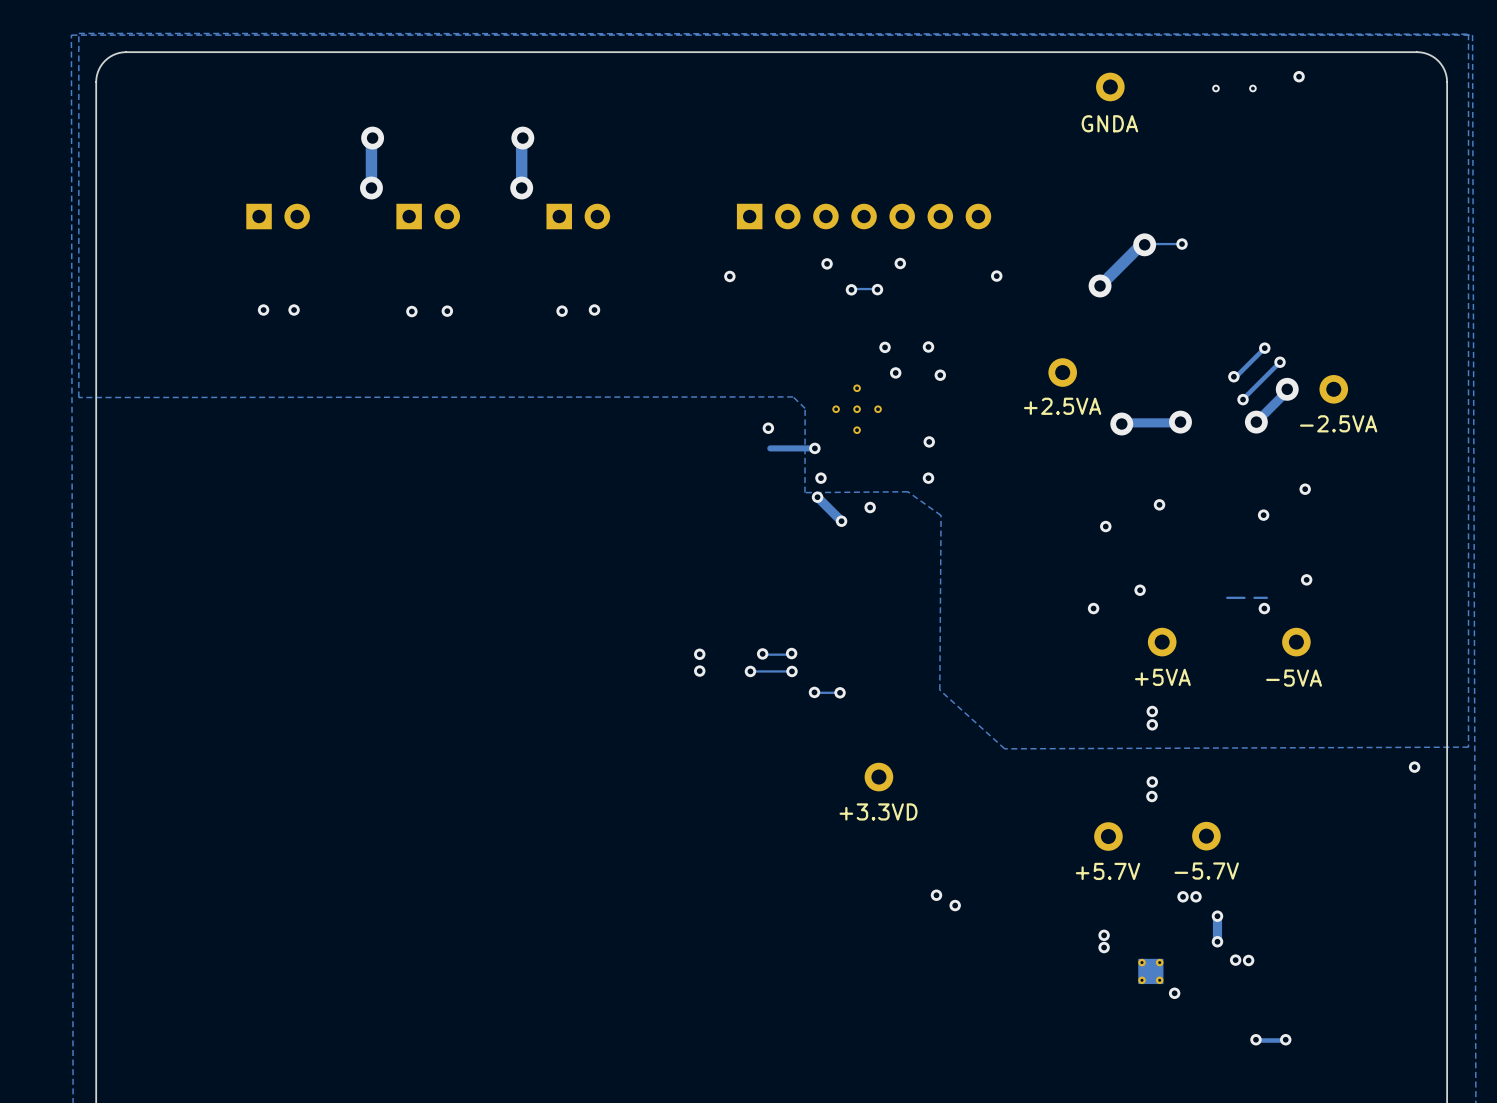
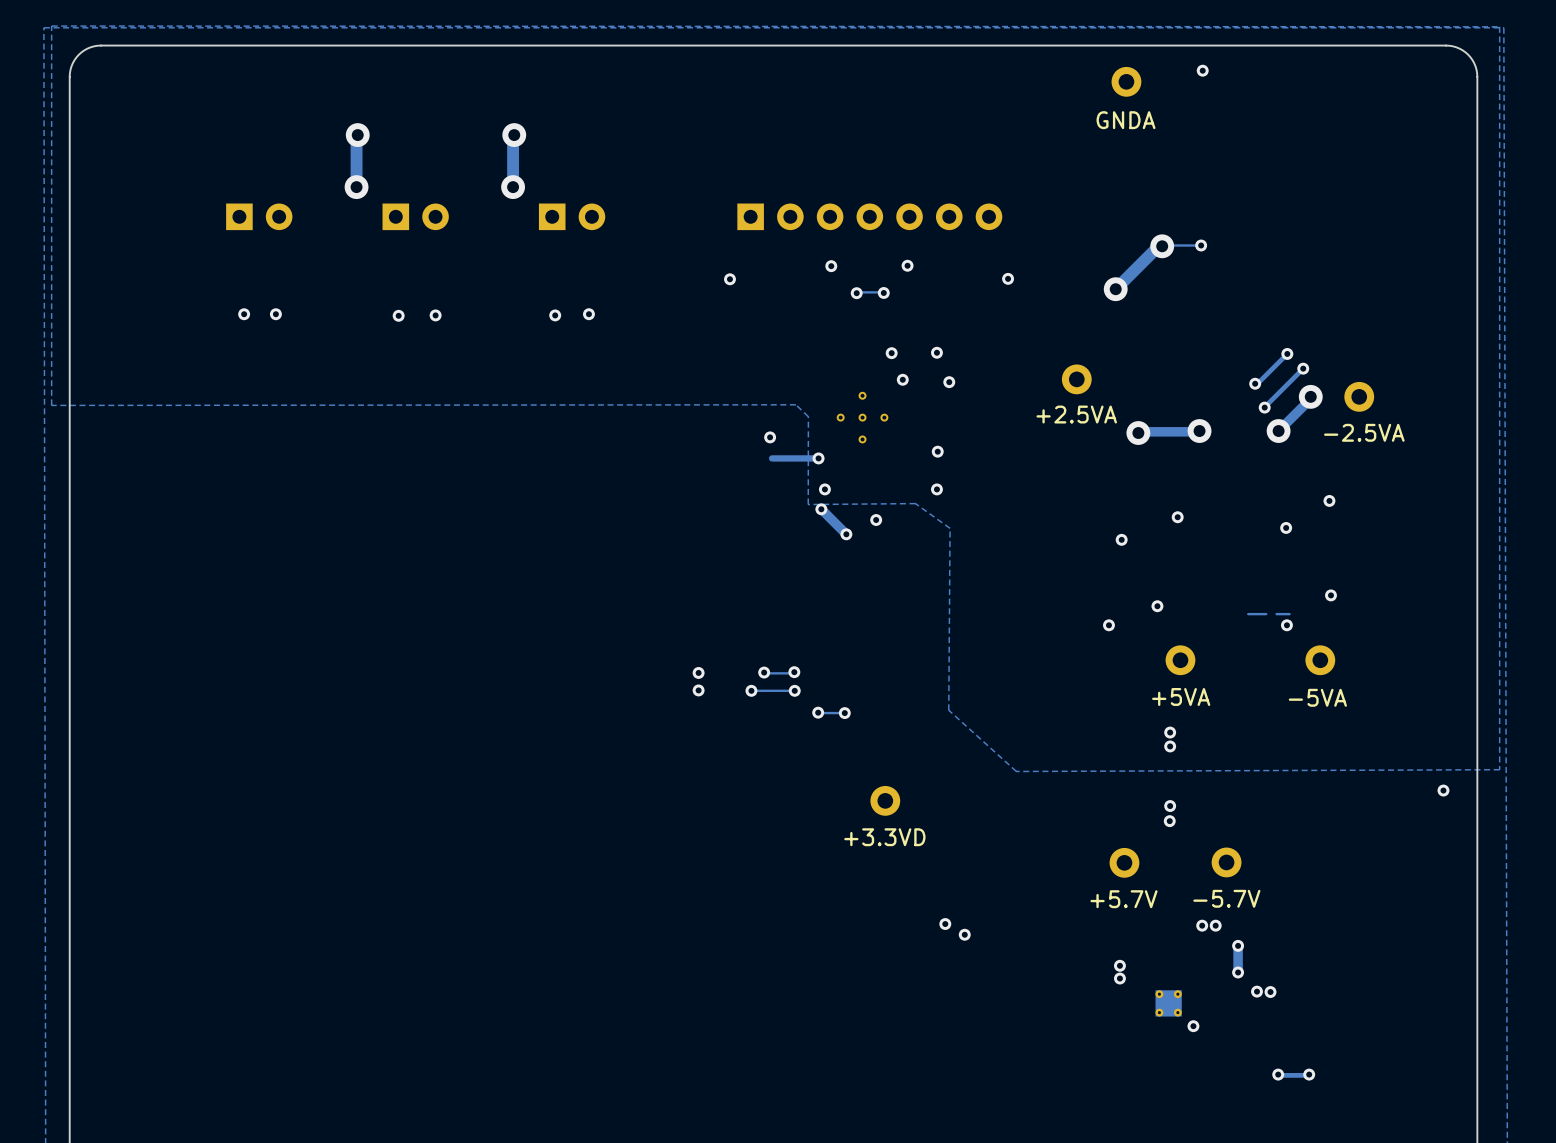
via: none -> (1202, 70)
via: (1299, 76) -> none
via: (1215, 88) -> none
via: (1252, 88) -> none

